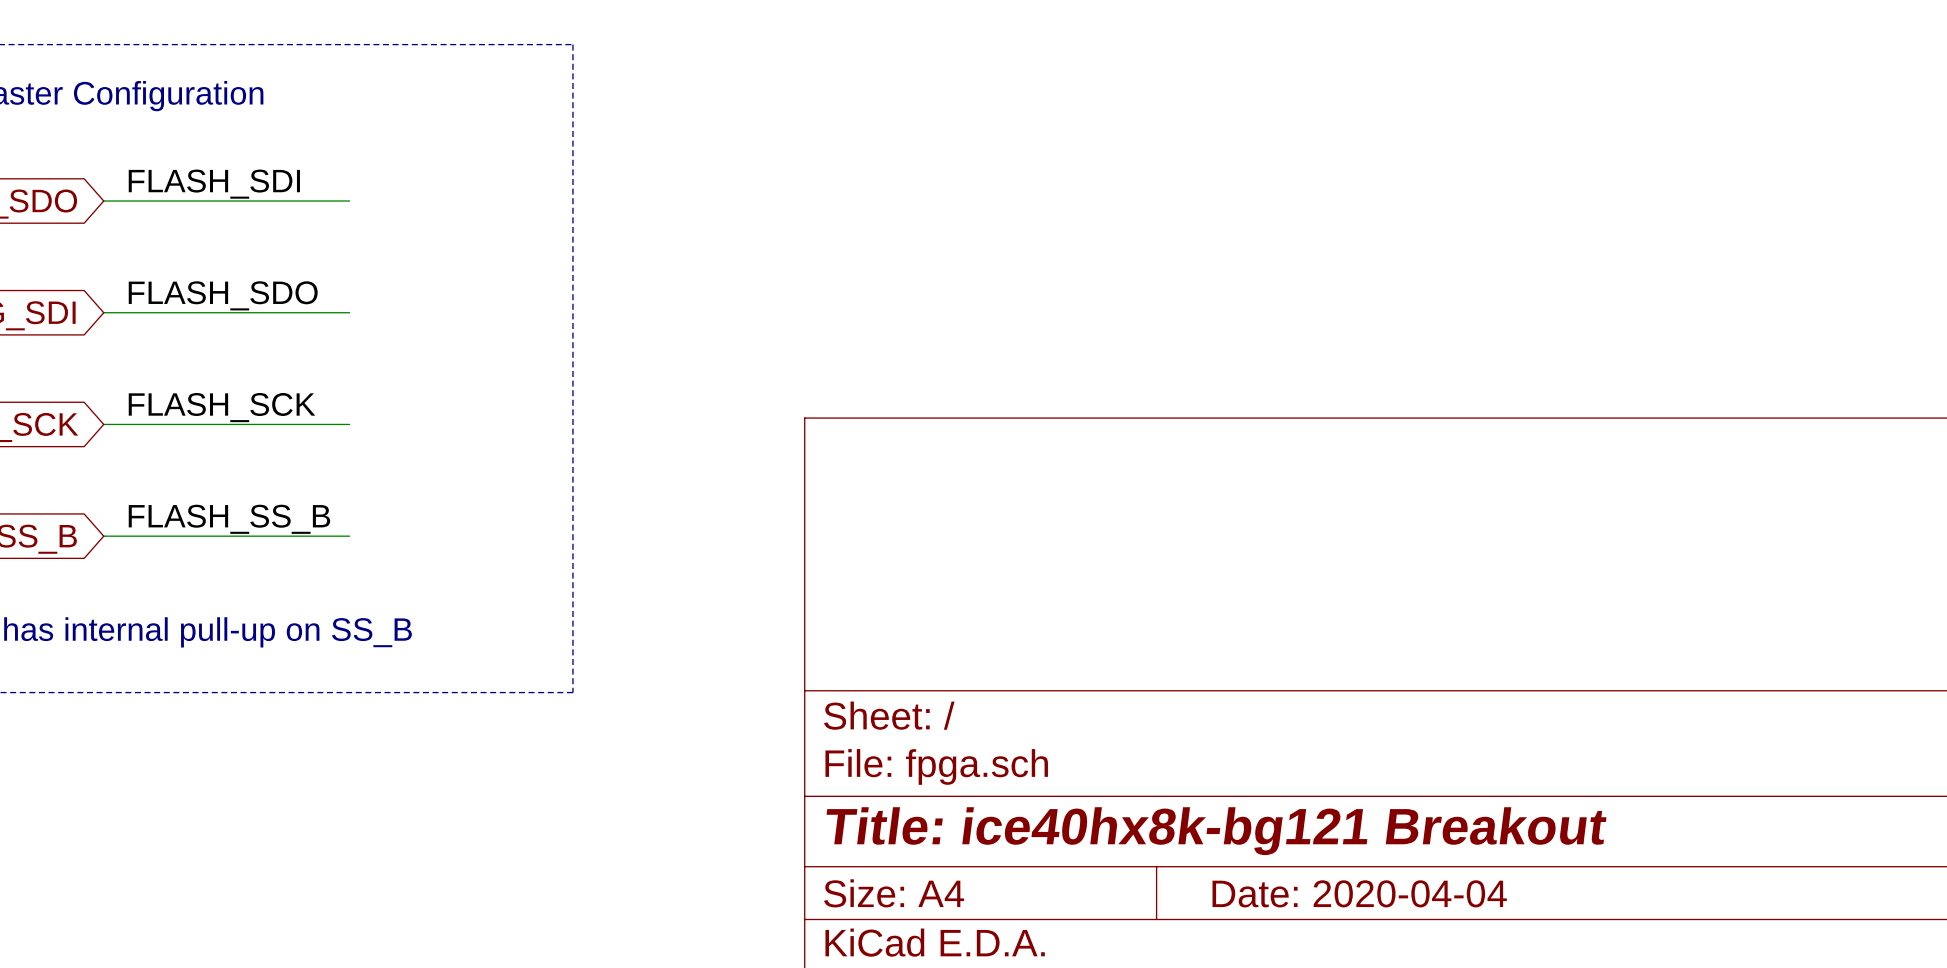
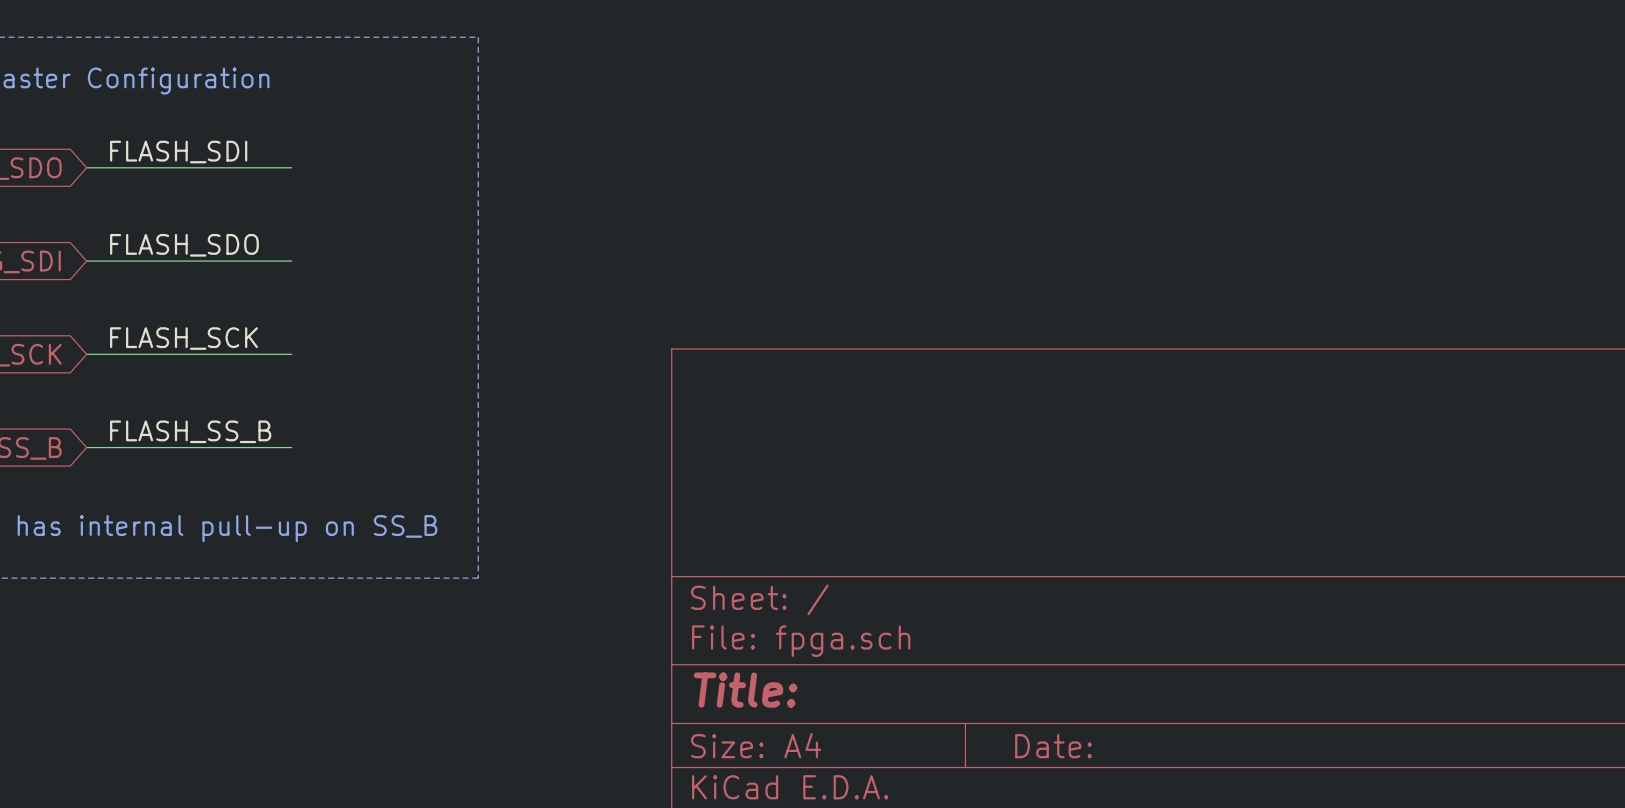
title block: Title: ice40hx8k-bg121 Breakout (1216, 831) -> Title: (745, 690)
title block: Date: 2020-04-04 (1359, 893) -> Date: (1053, 746)

